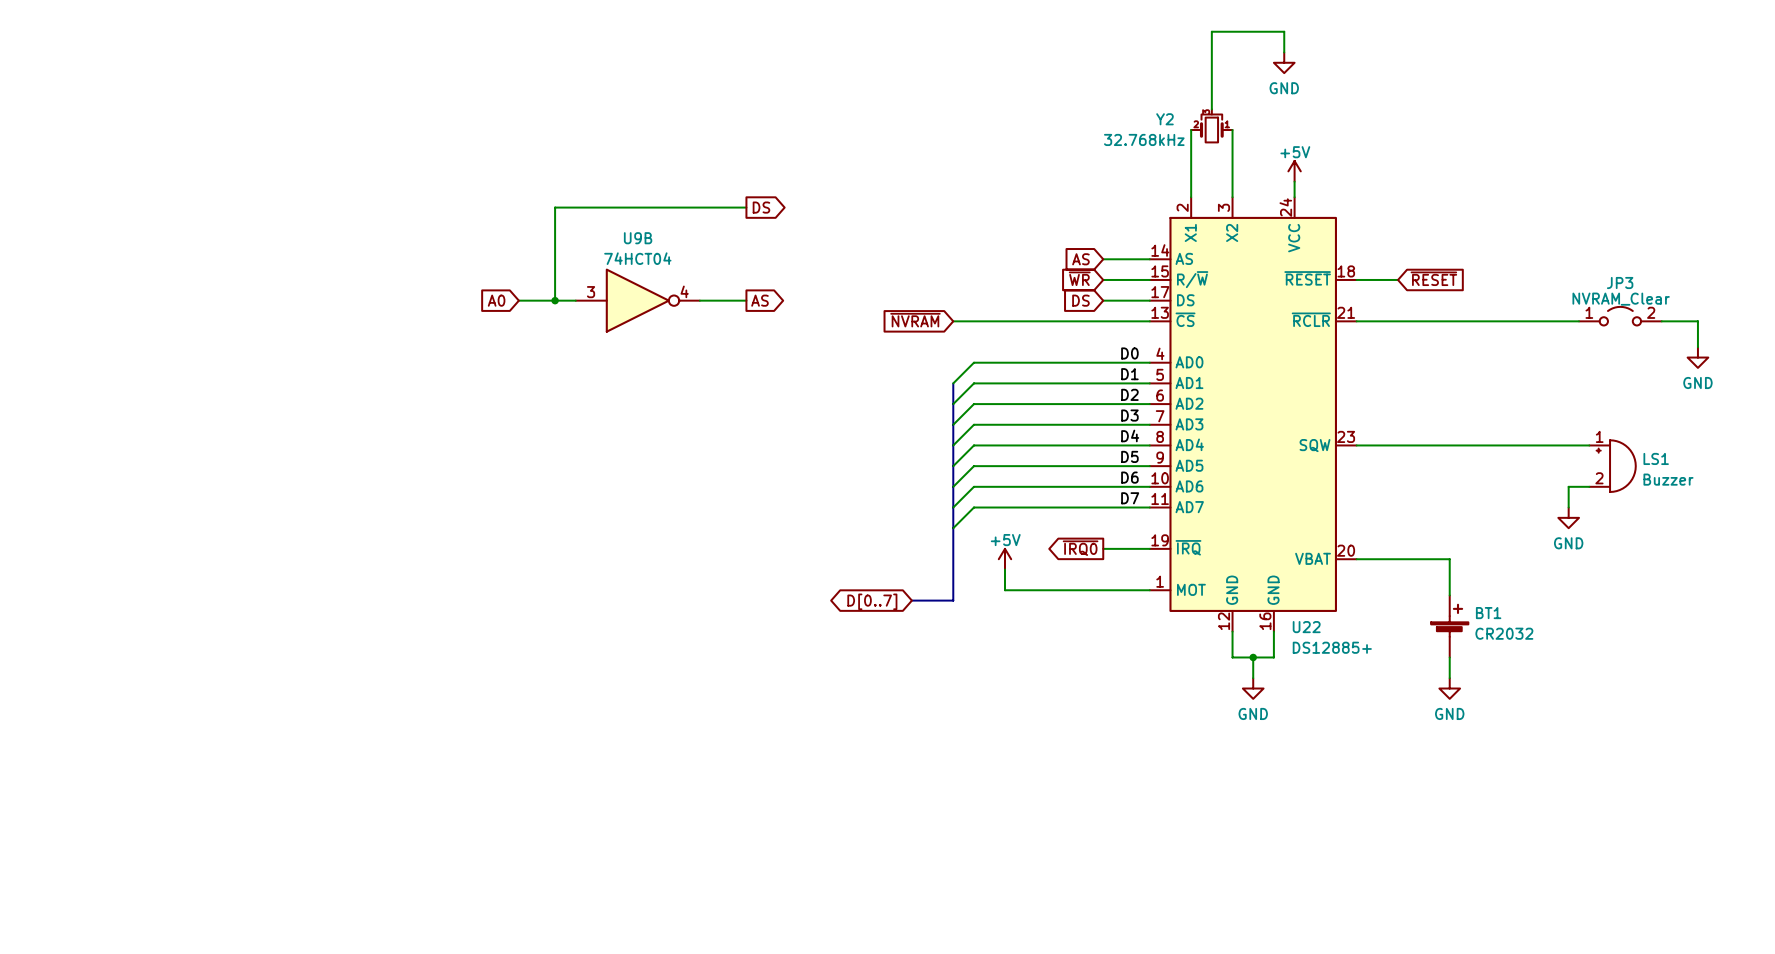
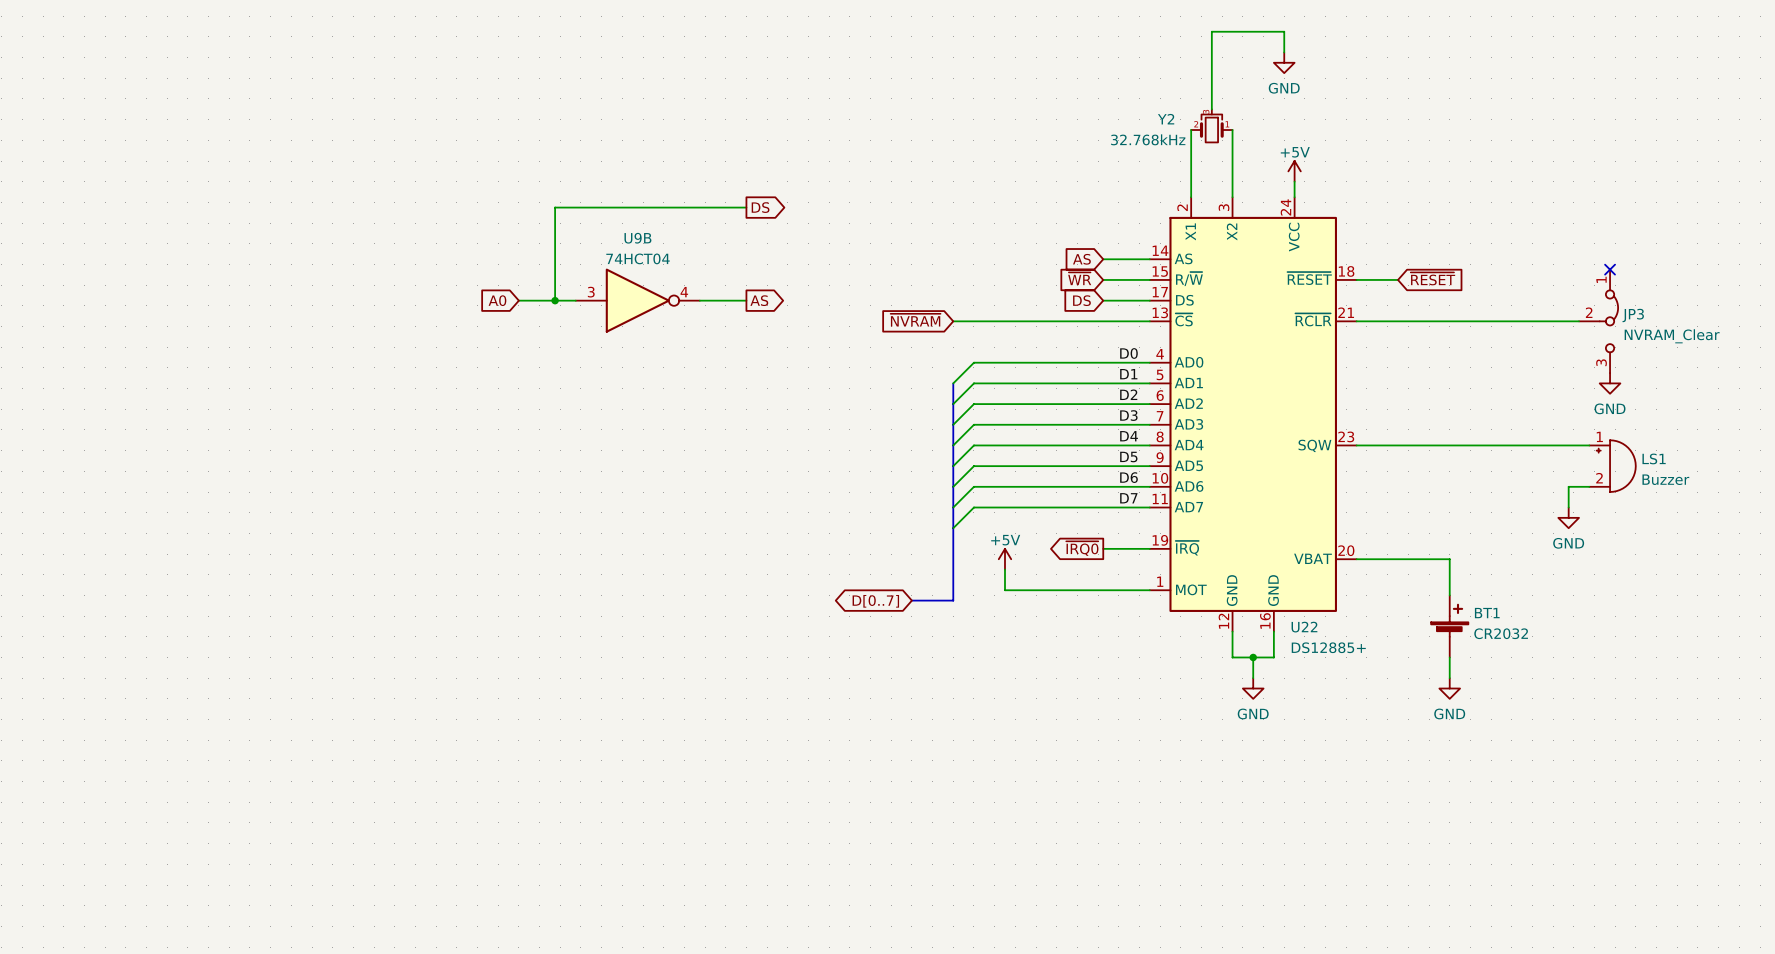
no-connect mark: none -> (1610, 269)
JP3 name position: JP3 (1620, 283) -> JP3 (1633, 315)
JP3 value position: NVRAM_Clear (1621, 299) -> NVRAM_Clear (1672, 336)
JP3 symbol: [1579, 306, 1662, 326] -> [1579, 269, 1619, 374]
wire: (1661, 321) (1697, 321) (1697, 347) -> none
power symbol position: GND (1697, 357) -> GND (1610, 383)

